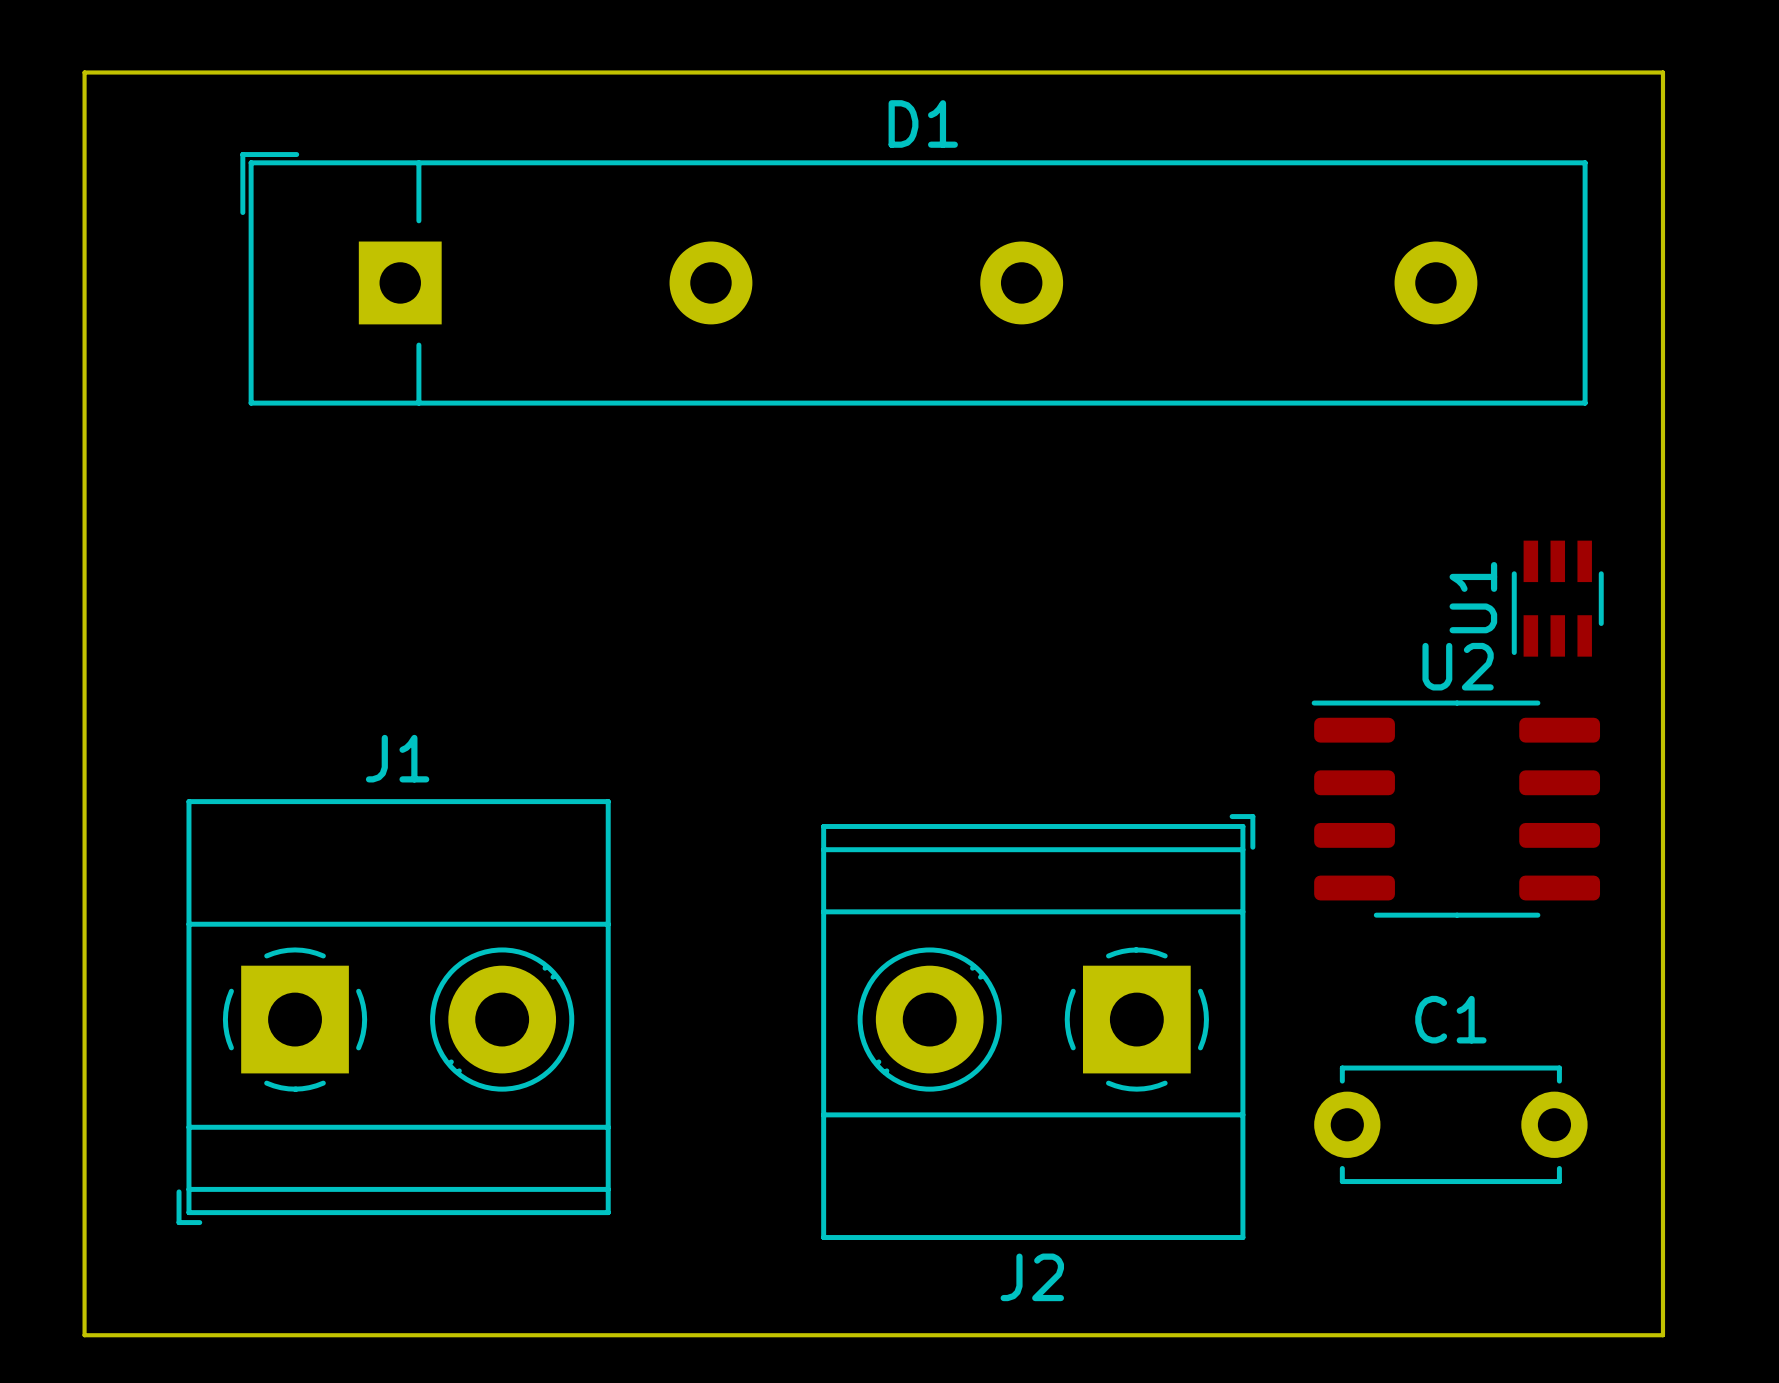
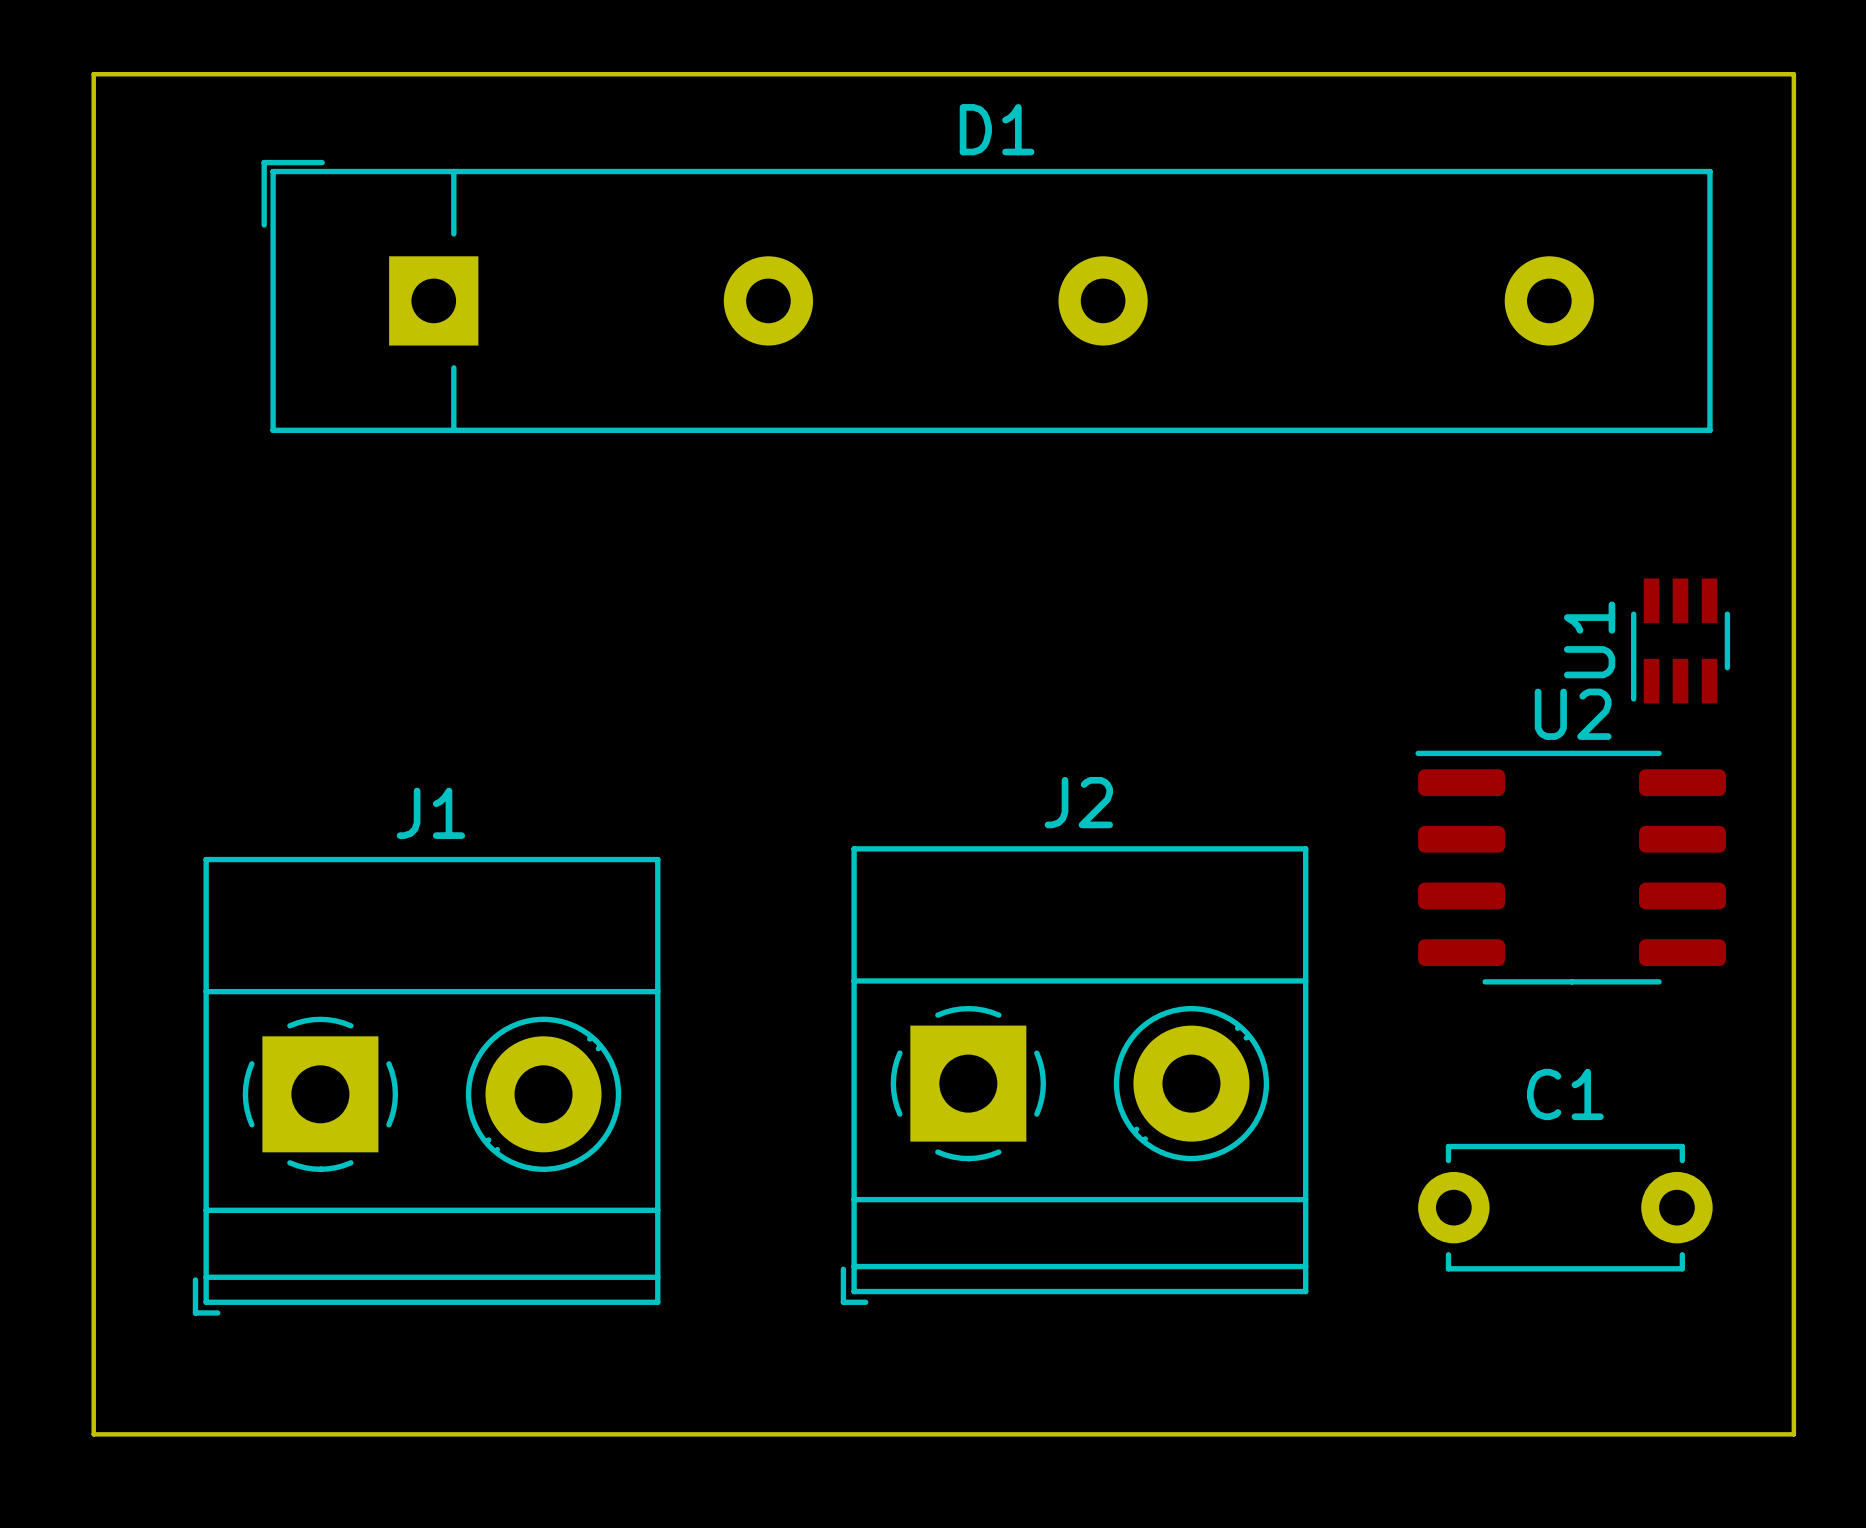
J2 rotation: 0° (1038, 1027) -> 180° (1074, 1075)

